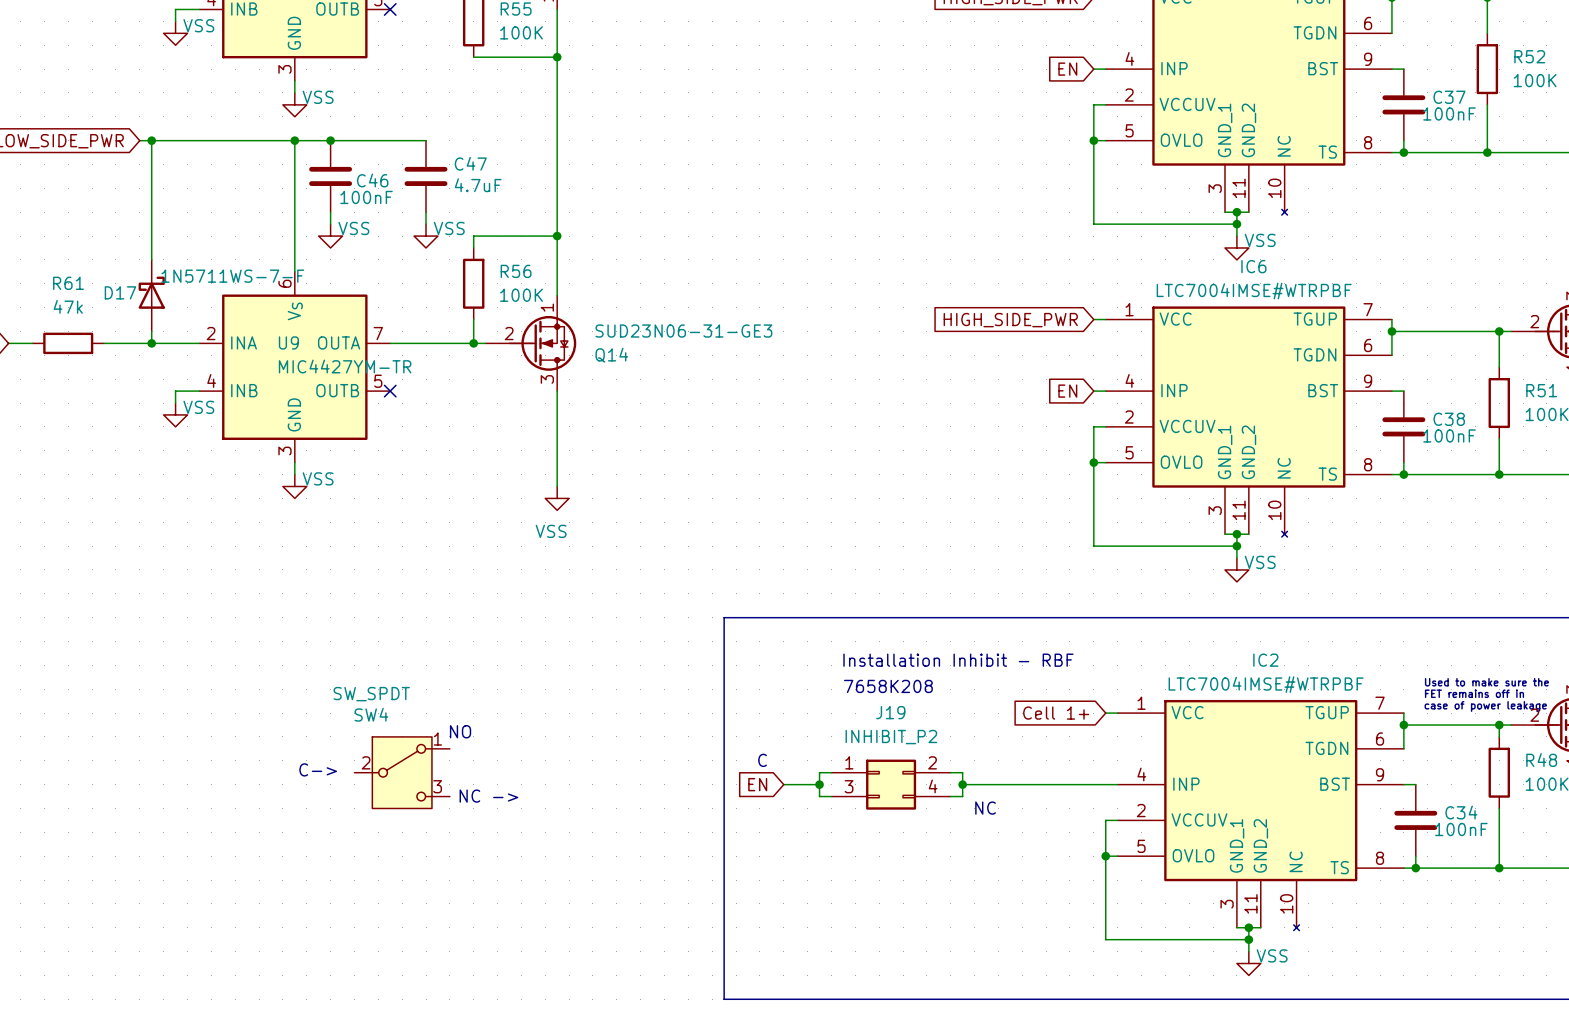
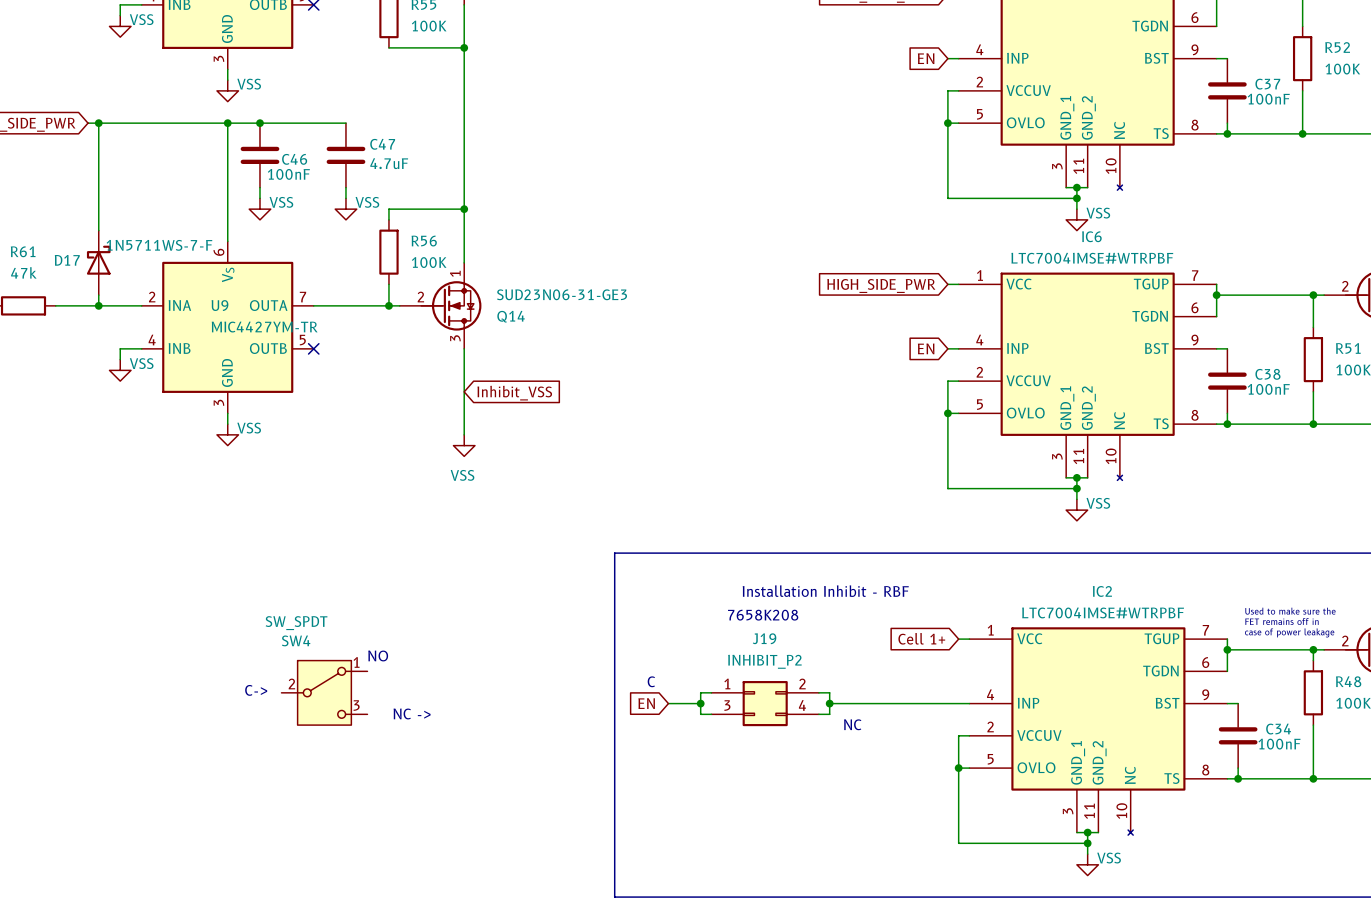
global label: none -> Inhibit_VSS (514, 393)

